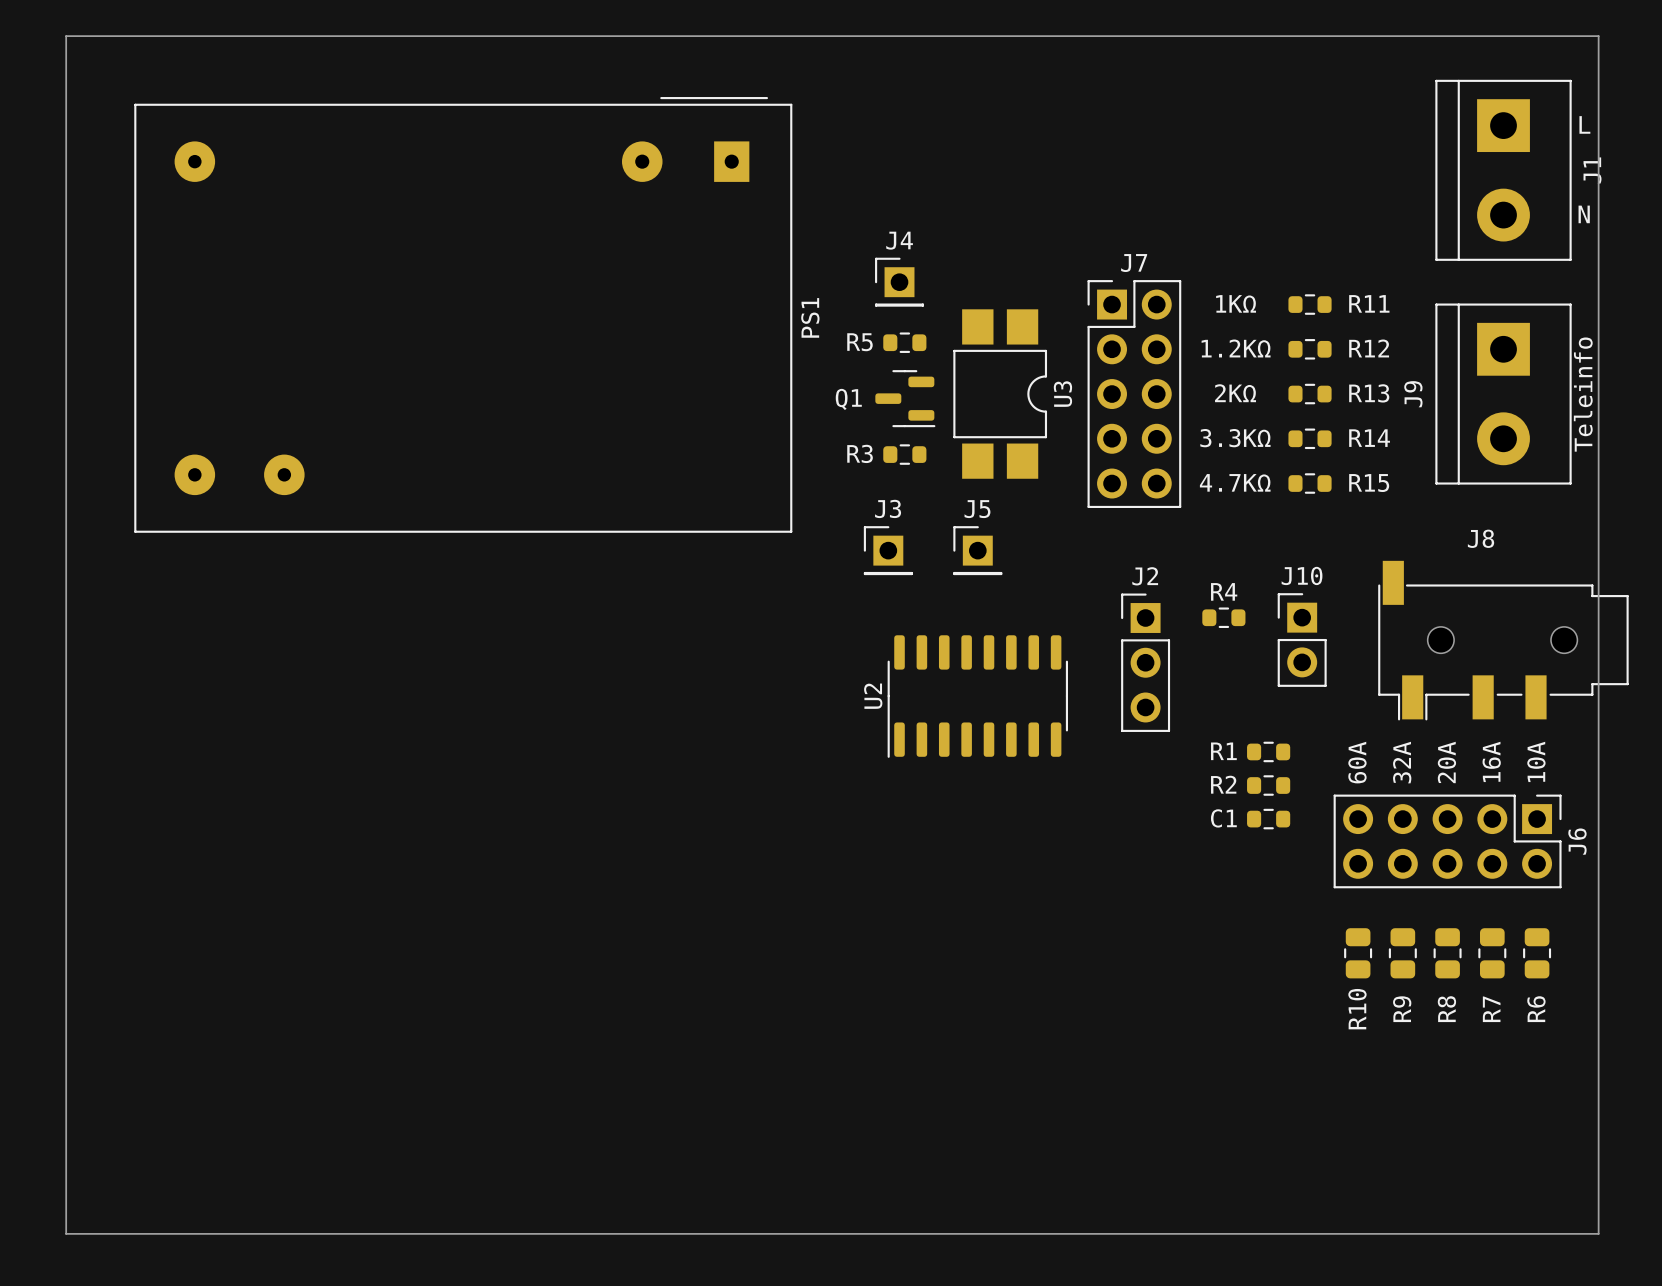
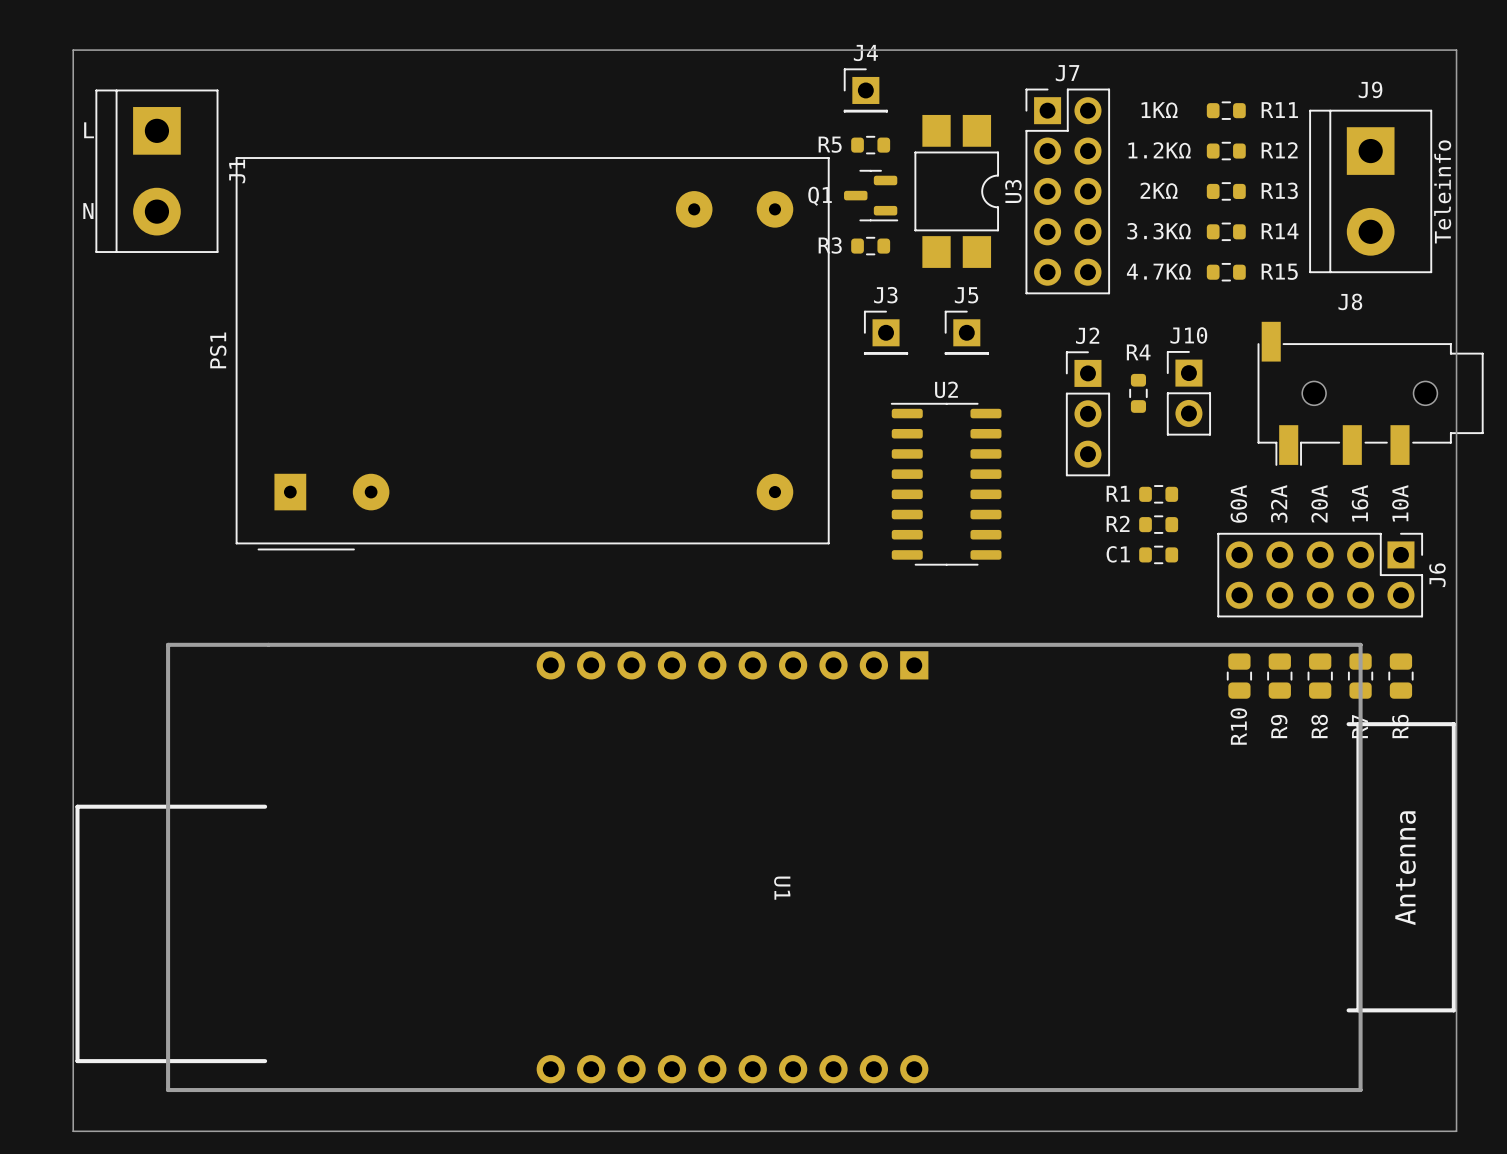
text: none -> L (89, 130)
text: L (1584, 124) -> none
J1 position: (1503, 170) -> (156, 171)
text: none -> N (88, 211)
text: N (1584, 214) -> none
J4 position: (899, 282) -> (865, 90)
text position: 1KΩ (1236, 303) -> 1KΩ (1159, 110)
R11 position: (1310, 304) -> (1226, 110)
PS1 rotation: 0° (463, 314) -> 180° (532, 353)
R5 position: (904, 342) -> (870, 145)
text position: 1.2KΩ (1236, 348) -> 1.2KΩ (1159, 150)
R12 position: (1310, 349) -> (1226, 151)
text position: 2KΩ (1235, 393) -> 2KΩ (1159, 190)
U3 position: (1000, 394) -> (956, 191)
J7 position: (1134, 394) -> (1067, 191)
R13 position: (1310, 394) -> (1226, 191)
J9 name rotation: 0° (1413, 394) -> 90° clockwise (1370, 89)
J9 name position: J9 (1413, 394) -> J9 (1370, 89)
J9 position: (1503, 394) -> (1370, 191)
text position: Teleinfo (1583, 394) -> Teleinfo (1442, 191)
Q1 position: (905, 398) -> (871, 195)
text position: 3.3KΩ (1235, 438) -> 3.3KΩ (1158, 231)
R14 position: (1310, 438) -> (1226, 231)
R3 position: (904, 454) -> (870, 246)
text position: 4.7KΩ (1235, 482) -> 4.7KΩ (1158, 271)
R15 position: (1310, 483) -> (1226, 272)
J3 position: (888, 550) -> (886, 332)
J5 position: (977, 550) -> (966, 332)
R4 rotation: 0° (1223, 617) -> 90° clockwise (1138, 393)
R4 position: (1223, 617) -> (1138, 393)
J10 position: (1302, 640) -> (1188, 393)
J8 position: (1503, 640) -> (1370, 393)
J2 position: (1145, 662) -> (1087, 413)
U2 rotation: 0° (977, 696) -> 90° clockwise (946, 484)
U2 position: (977, 696) -> (946, 484)
R1 position: (1268, 751) -> (1158, 494)
text position: 16A (1491, 761) -> 16A (1359, 503)
text position: 10A (1536, 761) -> 10A (1400, 503)
text position: 60A (1357, 762) -> 60A (1238, 503)
text position: 32A (1402, 762) -> 32A (1279, 503)
text position: 20A (1446, 762) -> 20A (1319, 503)
R2 position: (1268, 785) -> (1158, 524)
C1 position: (1268, 819) -> (1158, 554)
J6 position: (1447, 841) -> (1320, 575)
U1: none -> (765, 867)
R10 position: (1358, 953) -> (1239, 676)
R9 position: (1402, 953) -> (1279, 676)
R8 position: (1447, 953) -> (1320, 676)
R7 position: (1492, 953) -> (1360, 676)
R6 position: (1537, 953) -> (1400, 676)

